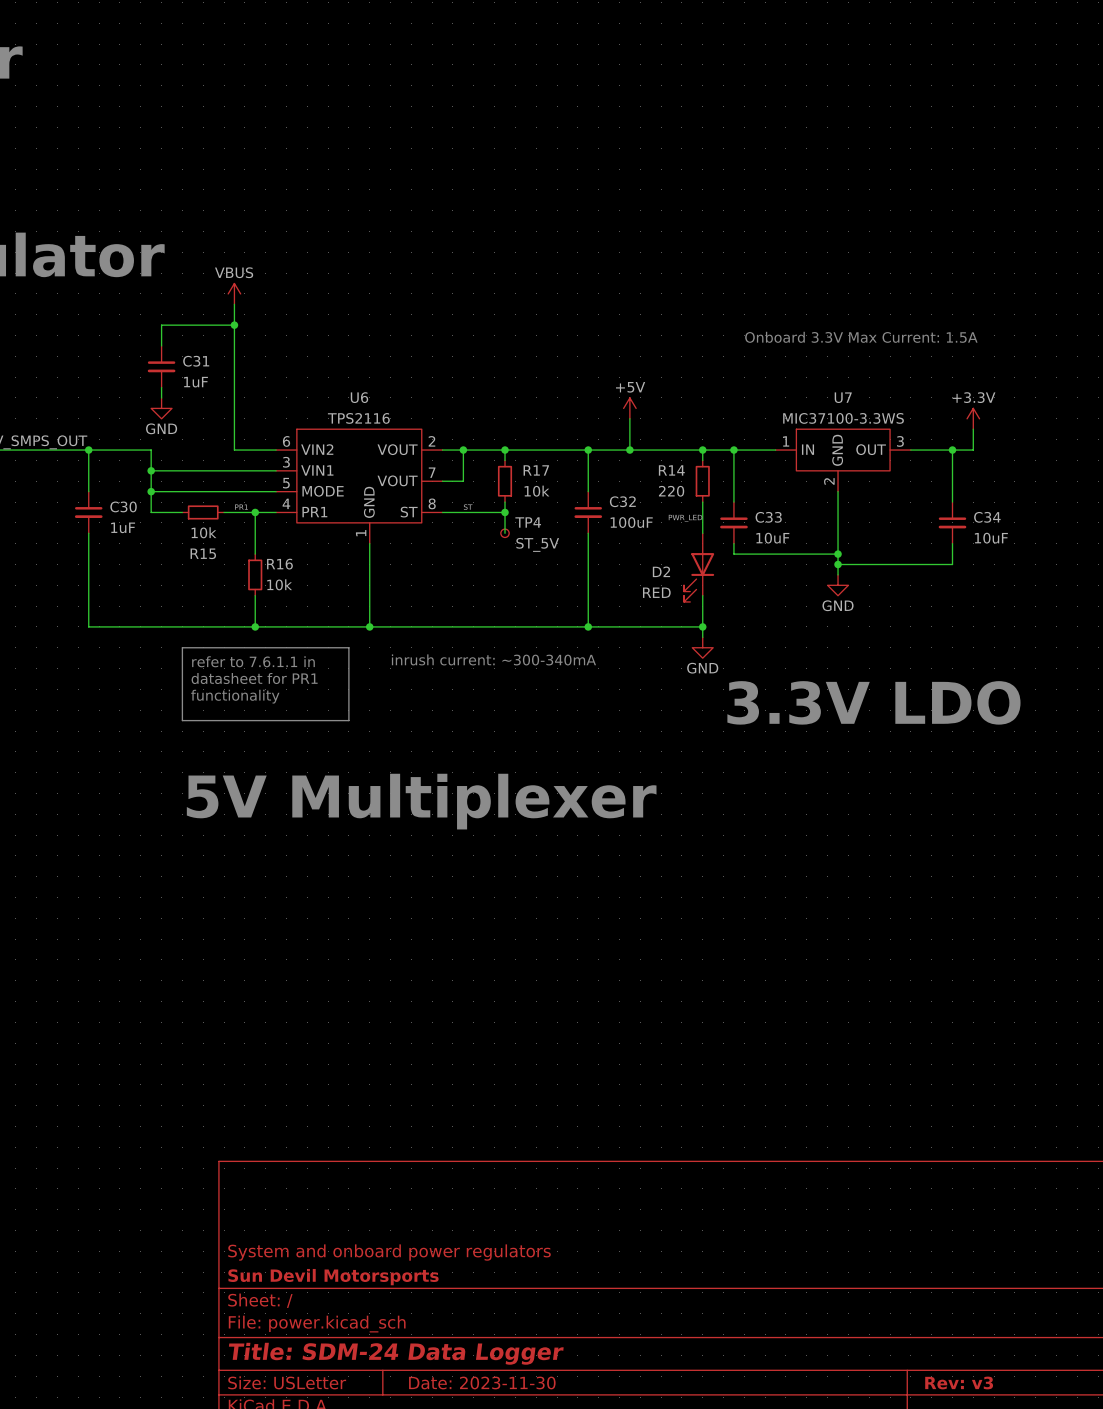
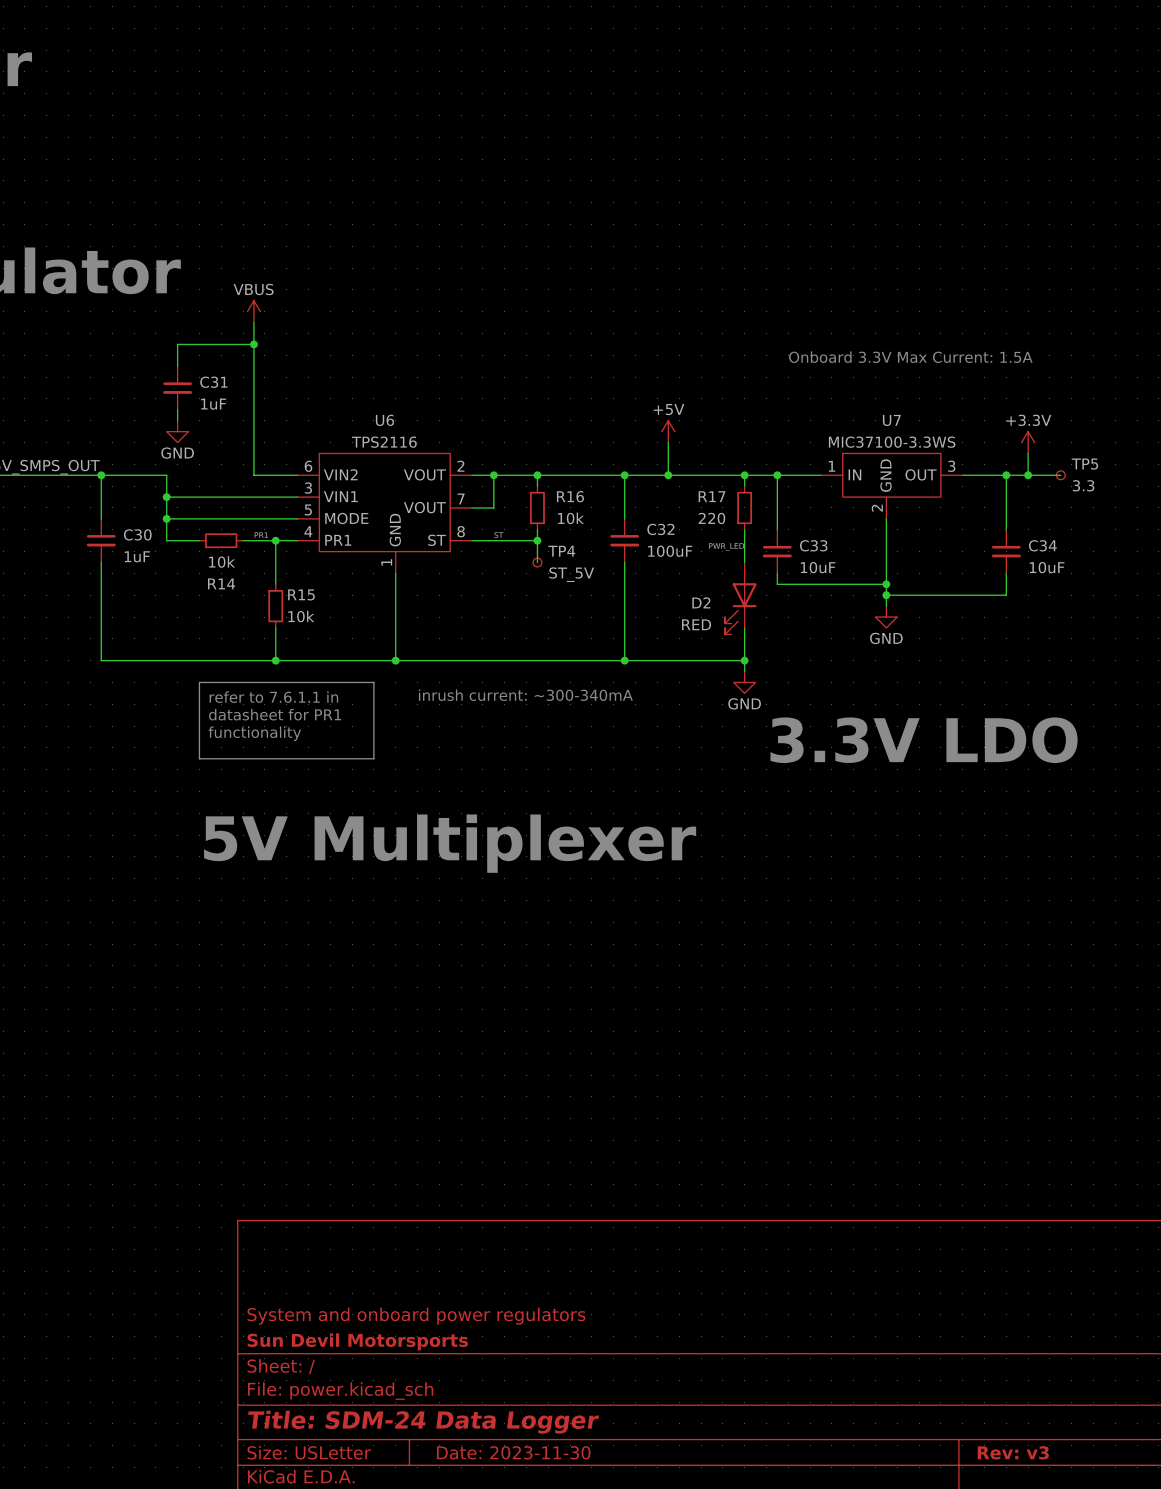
wire: none -> (1028, 475) (1060, 475)
junction: none -> (1028, 475)
TP5: none -> 3.3 (1060, 475)
R17 name: R17 (536, 470) -> R16 (570, 496)
R14 name: R14 (671, 470) -> R17 (712, 496)
R15 name: R15 (203, 553) -> R14 (221, 583)
R16 name: R16 (279, 564) -> R15 (301, 594)

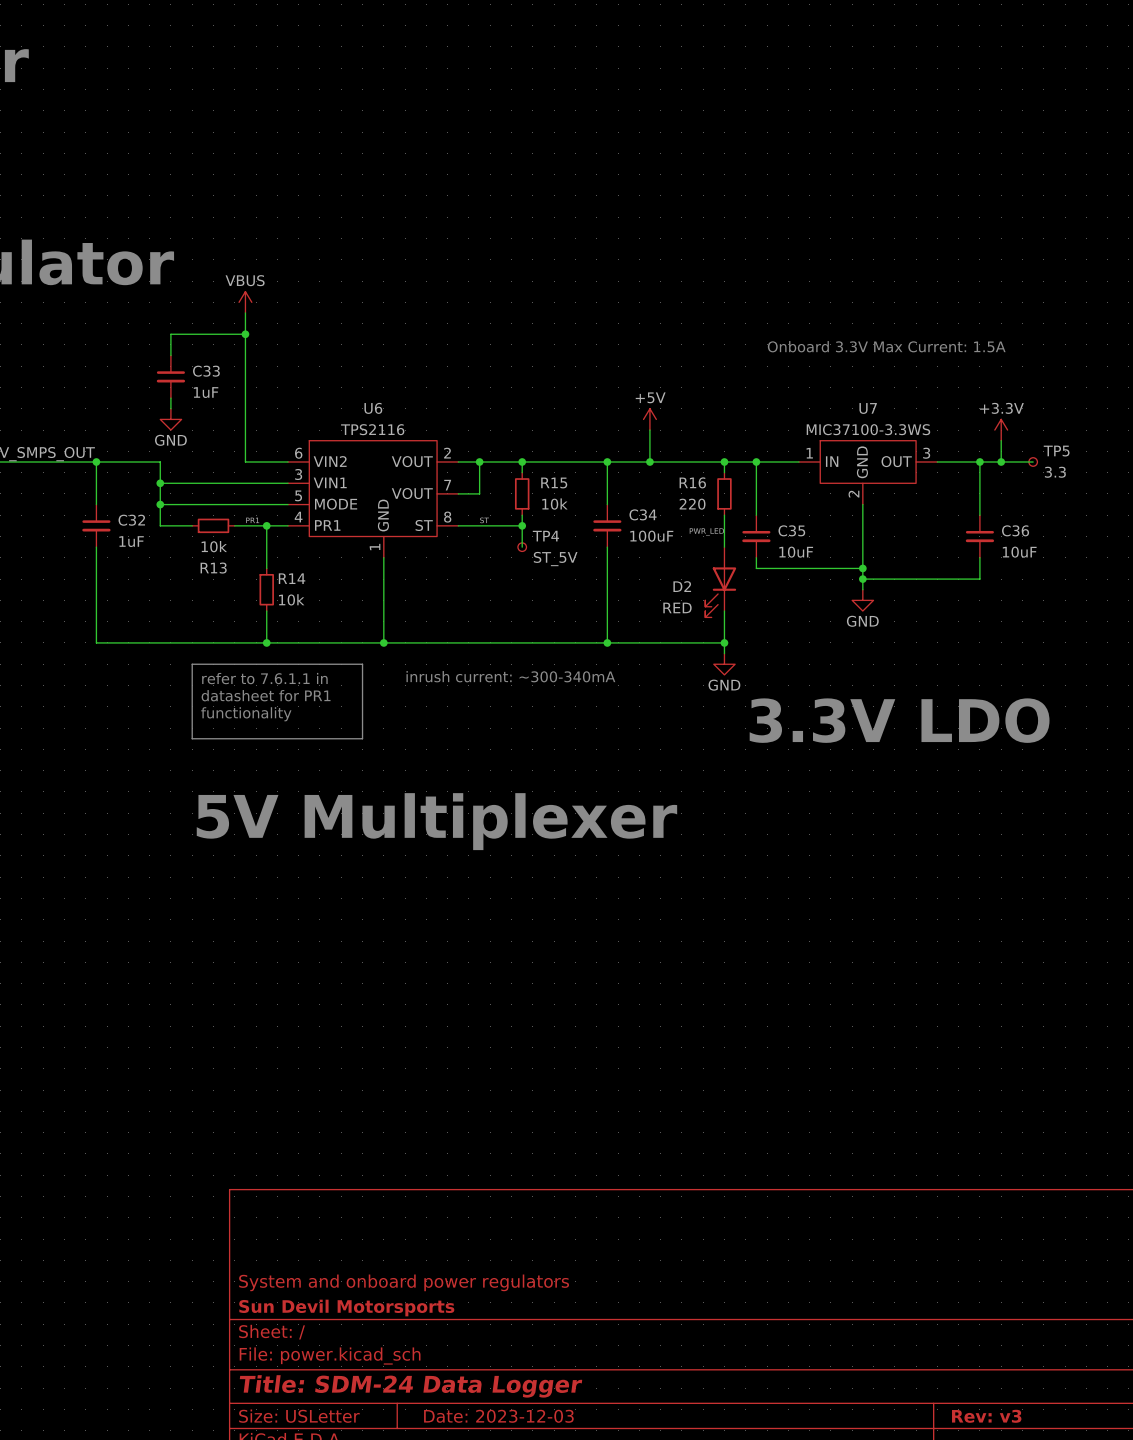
C31 name: C31 (213, 382) -> C33 (206, 371)
R16 name: R16 (570, 496) -> R15 (554, 482)
R17 name: R17 (712, 496) -> R16 (692, 482)
C32 name: C32 (660, 529) -> C34 (643, 514)
C30 name: C30 (137, 534) -> C32 (131, 520)
C33 name: C33 (813, 545) -> C35 (791, 530)
C34 name: C34 (1042, 545) -> C36 (1015, 530)
R14 name: R14 (221, 583) -> R13 (213, 568)
R15 name: R15 (301, 594) -> R14 (292, 578)
title block: Date: 2023-11-30 (513, 1452) -> Date: 2023-12-03 (498, 1416)

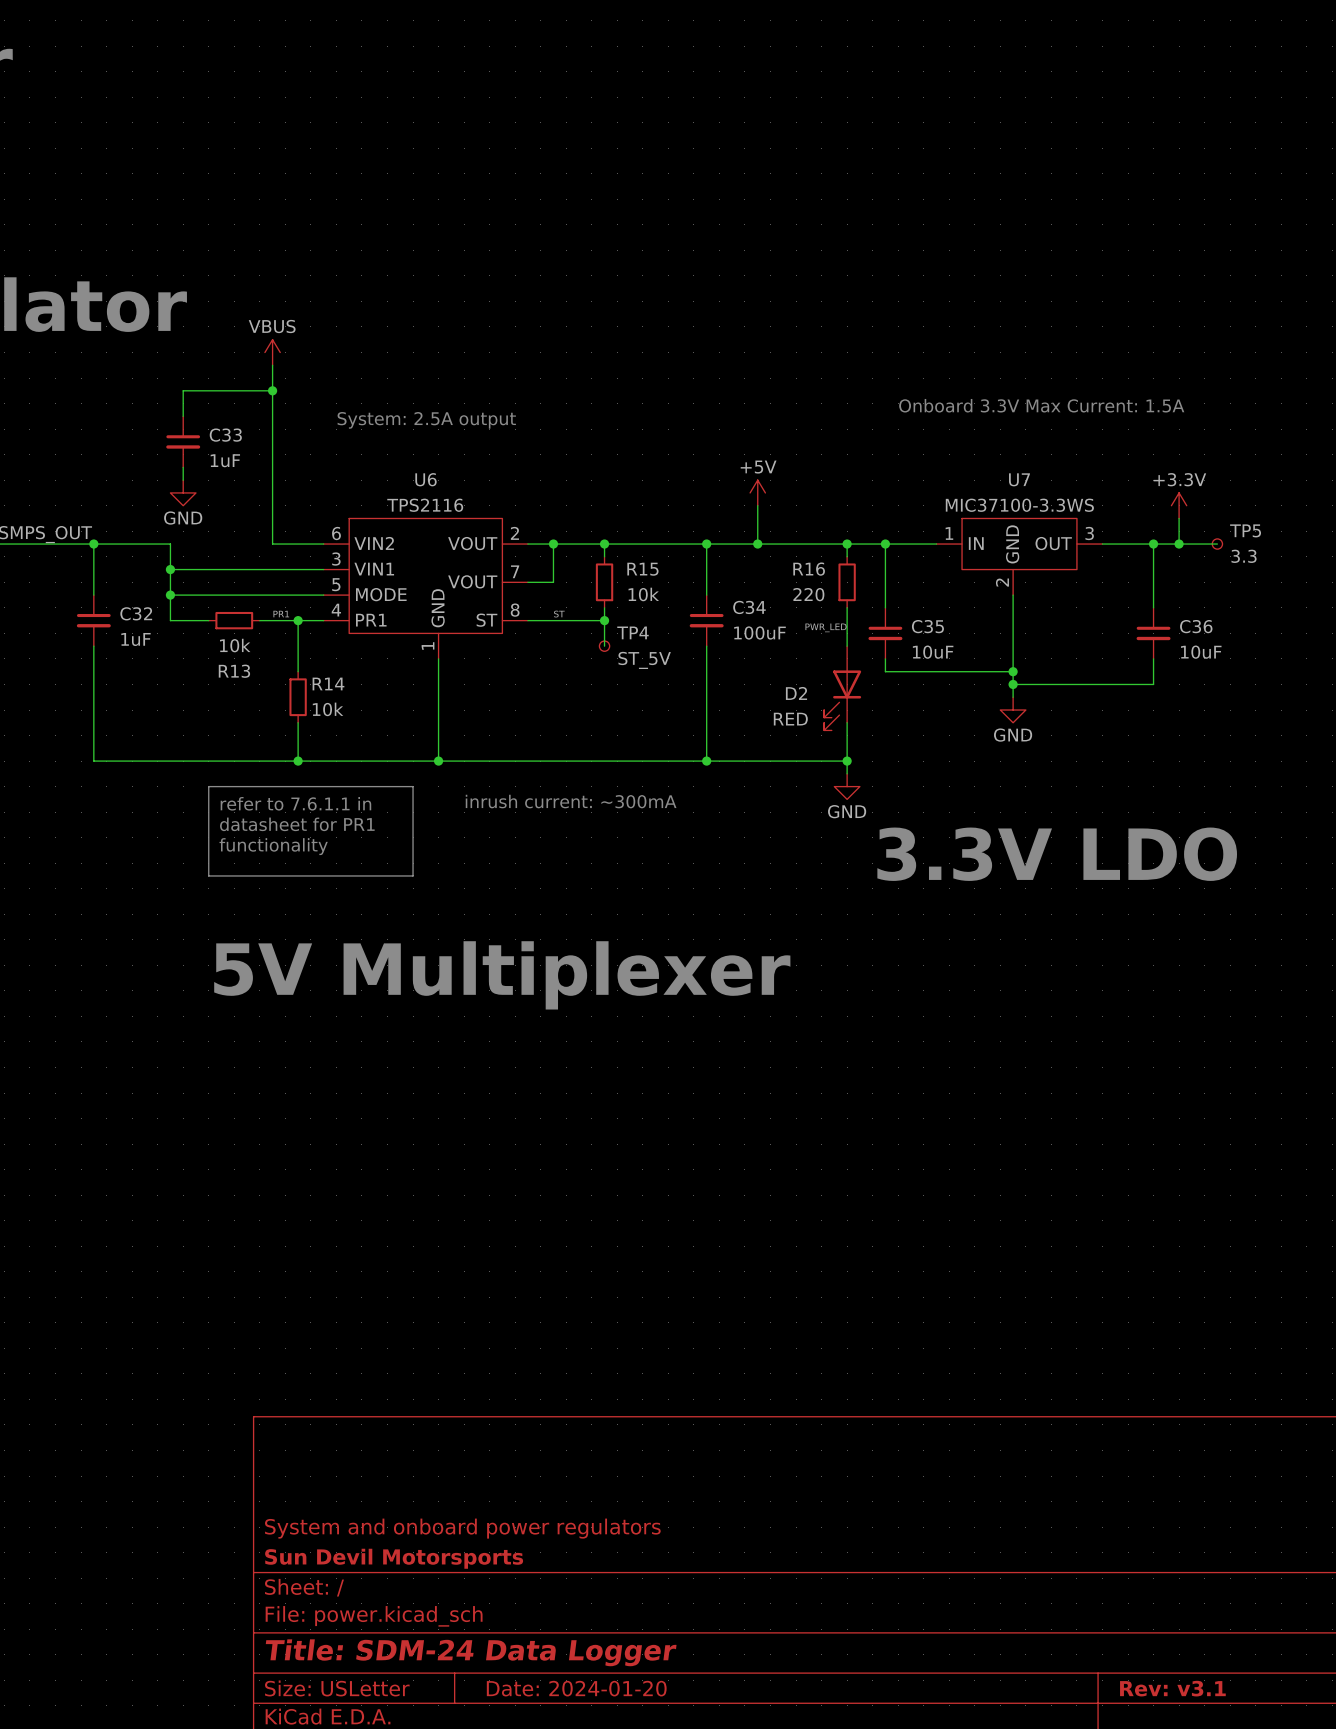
text: none -> System: 2.5A output (426, 420)
text: inrush current: ~300-340mA (510, 676) -> inrush current: ~300mA (571, 801)
title block: Date: 2023-12-03 (498, 1416) -> Date: 2024-01-20 (576, 1688)
title block: Rev: v3 (986, 1416) -> Rev: v3.1 (1172, 1688)

